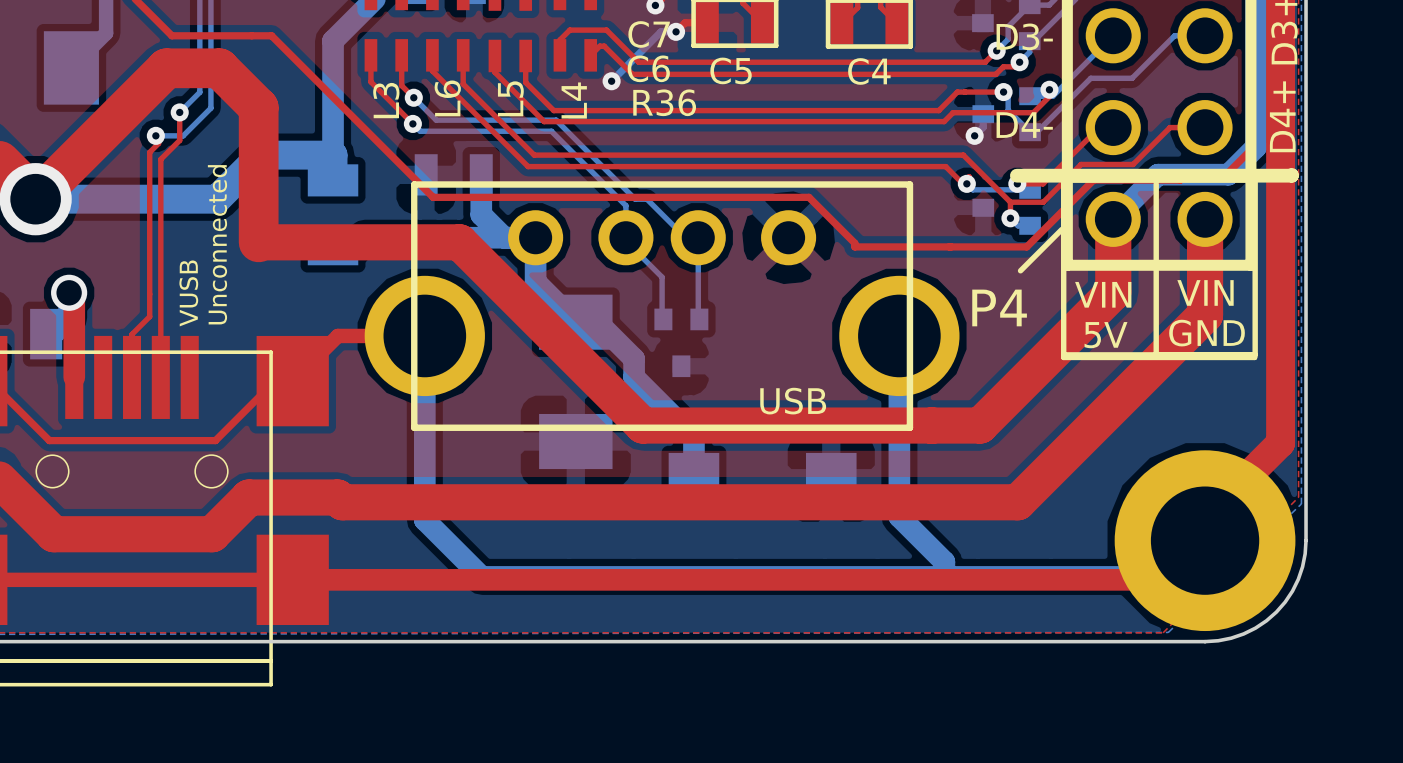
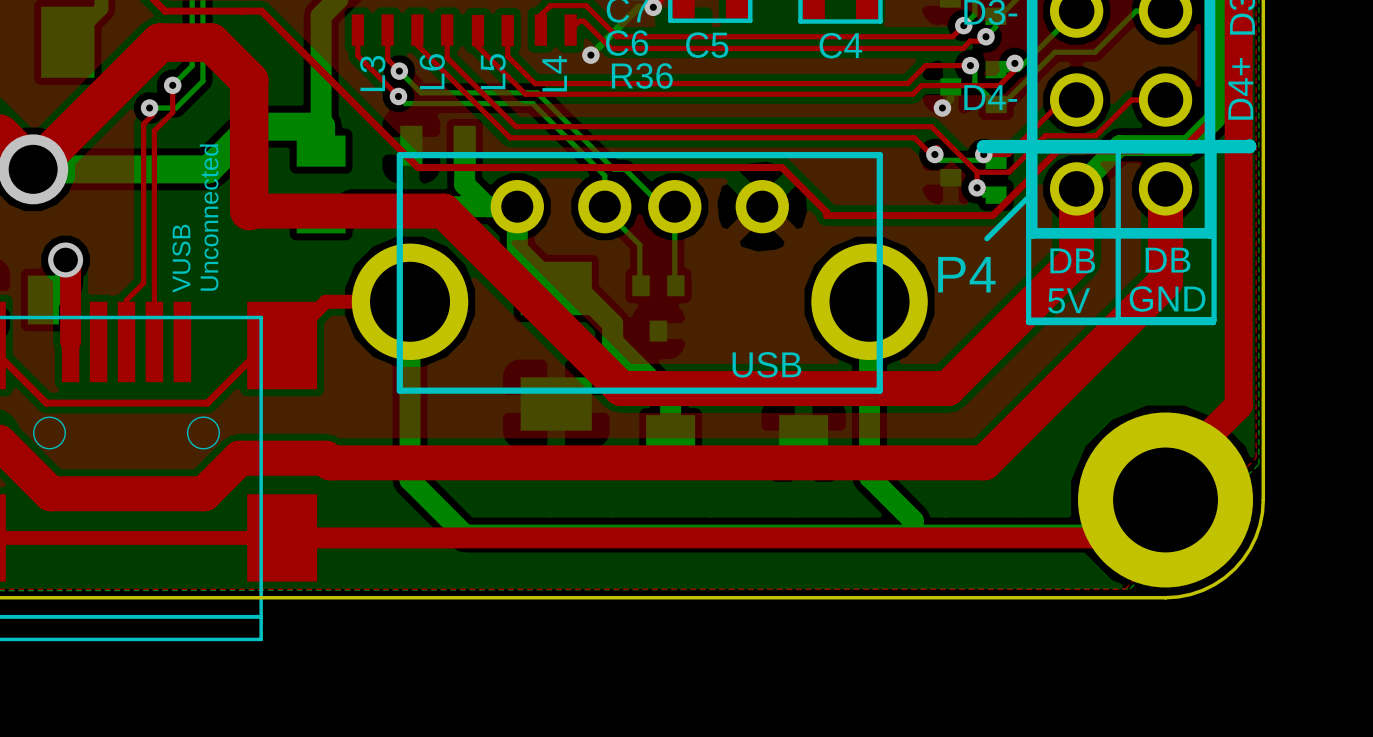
text: VIN (1205, 292) -> DB (1168, 260)
text: VIN (1103, 294) -> DB (1072, 260)

